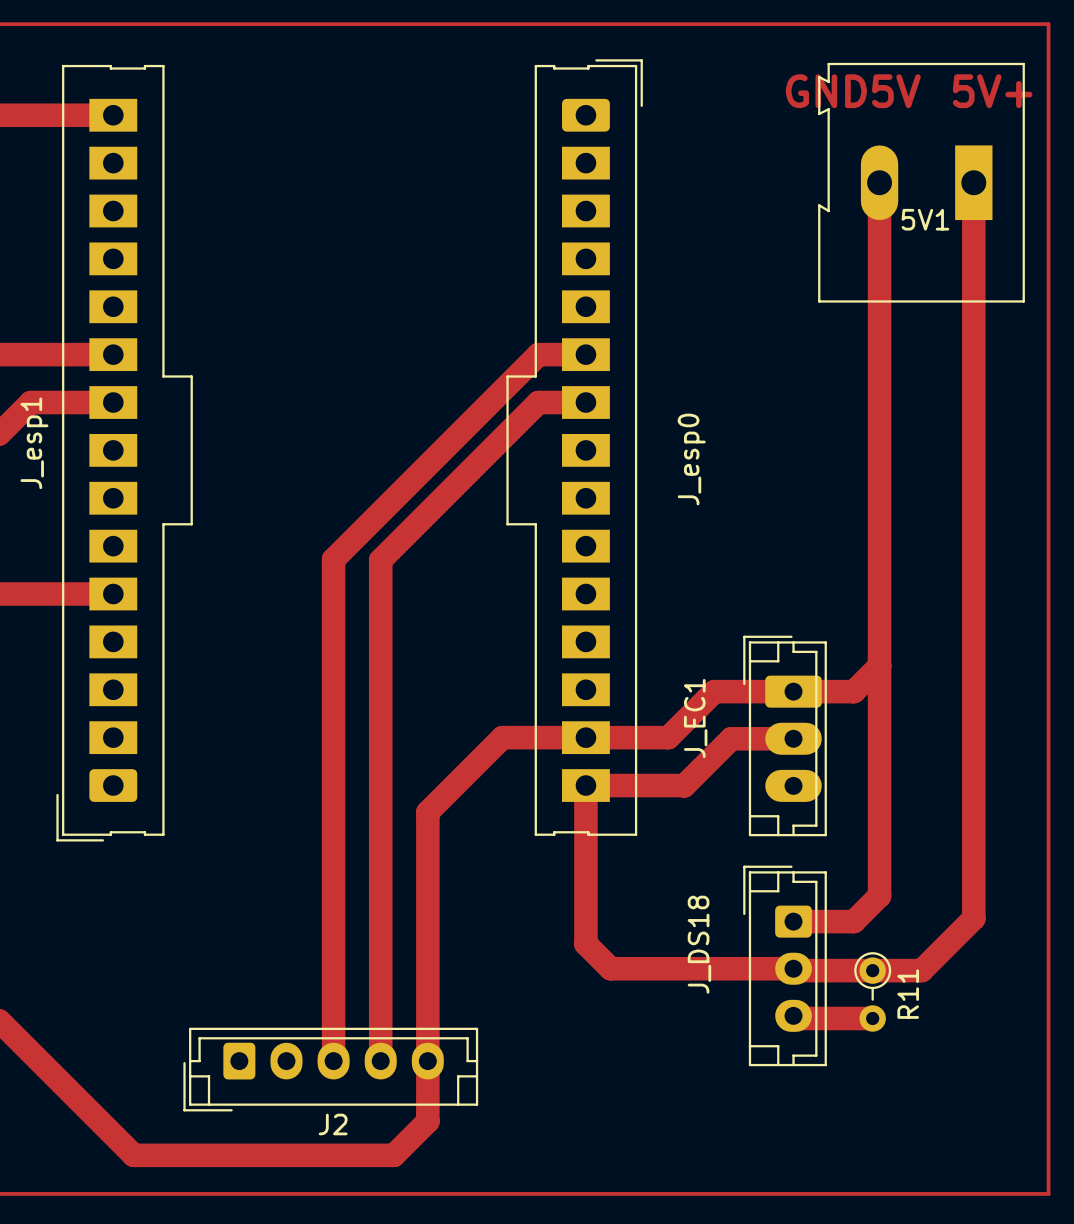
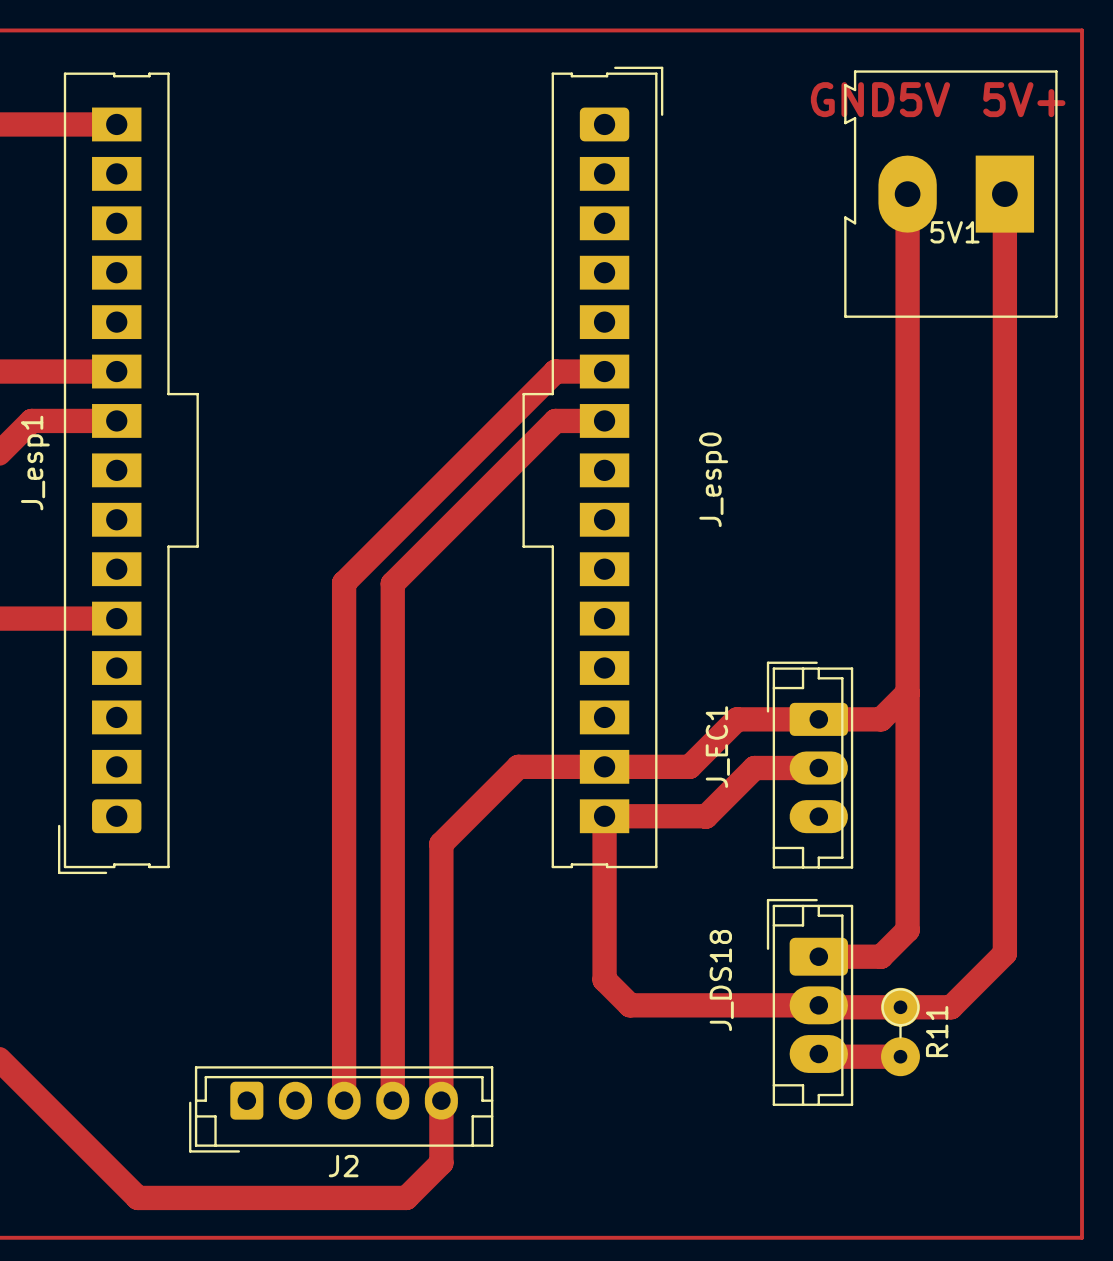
5V1 footprint: [818, 62, 1025, 303] -> [844, 70, 1058, 318]
J_DS18 footprint: [743, 865, 827, 1067] -> [766, 898, 854, 1106]
R11 footprint: [854, 952, 892, 1032] -> [881, 987, 920, 1077]

